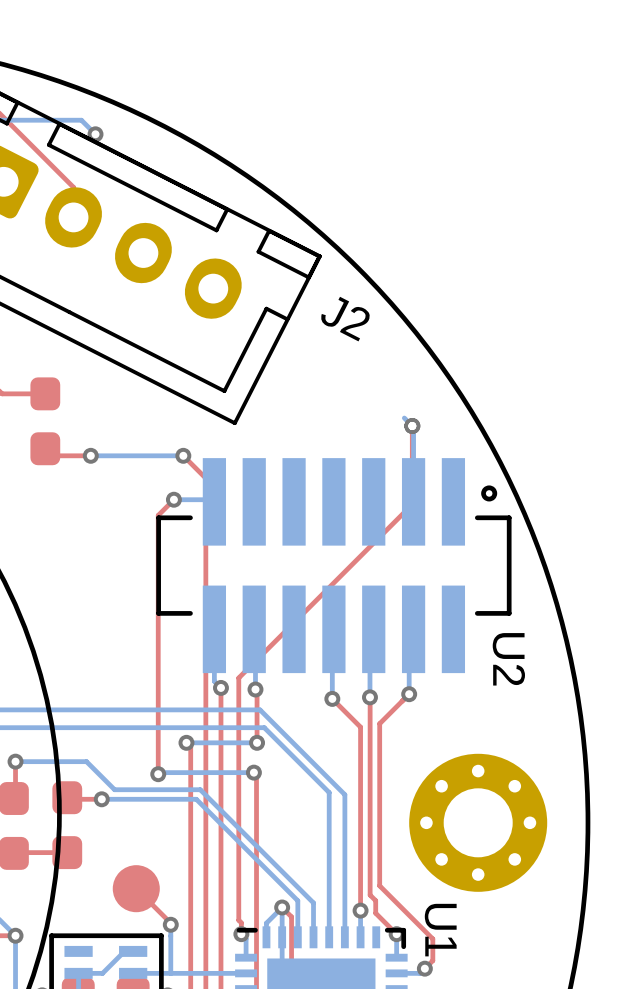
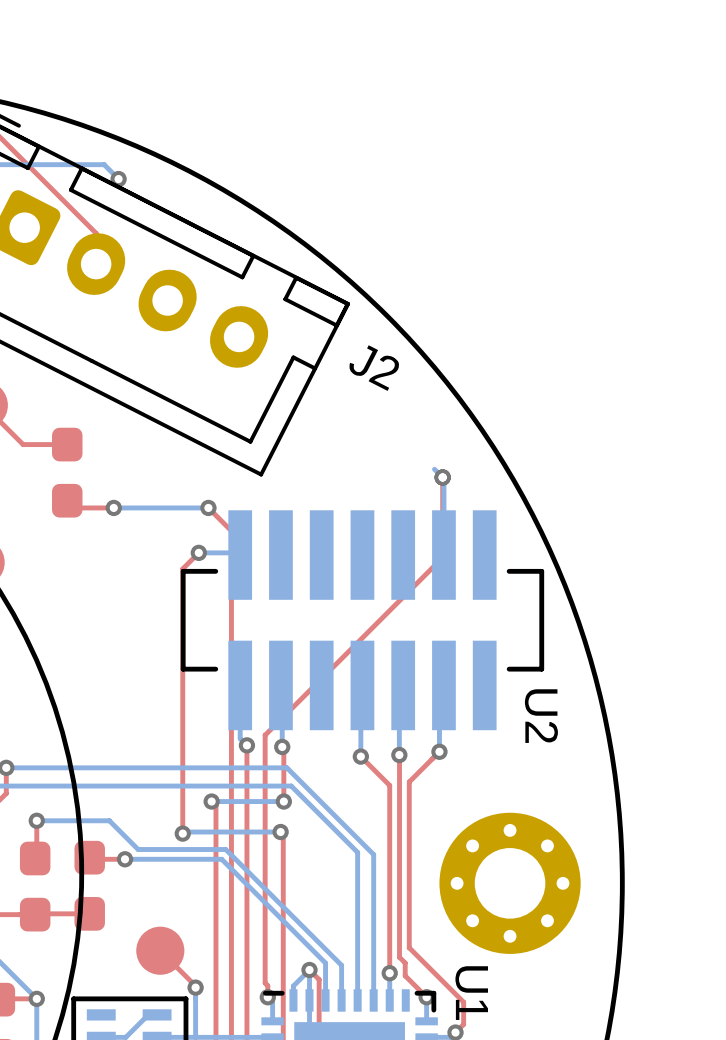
drawing: [481, 485, 498, 502] -> none

